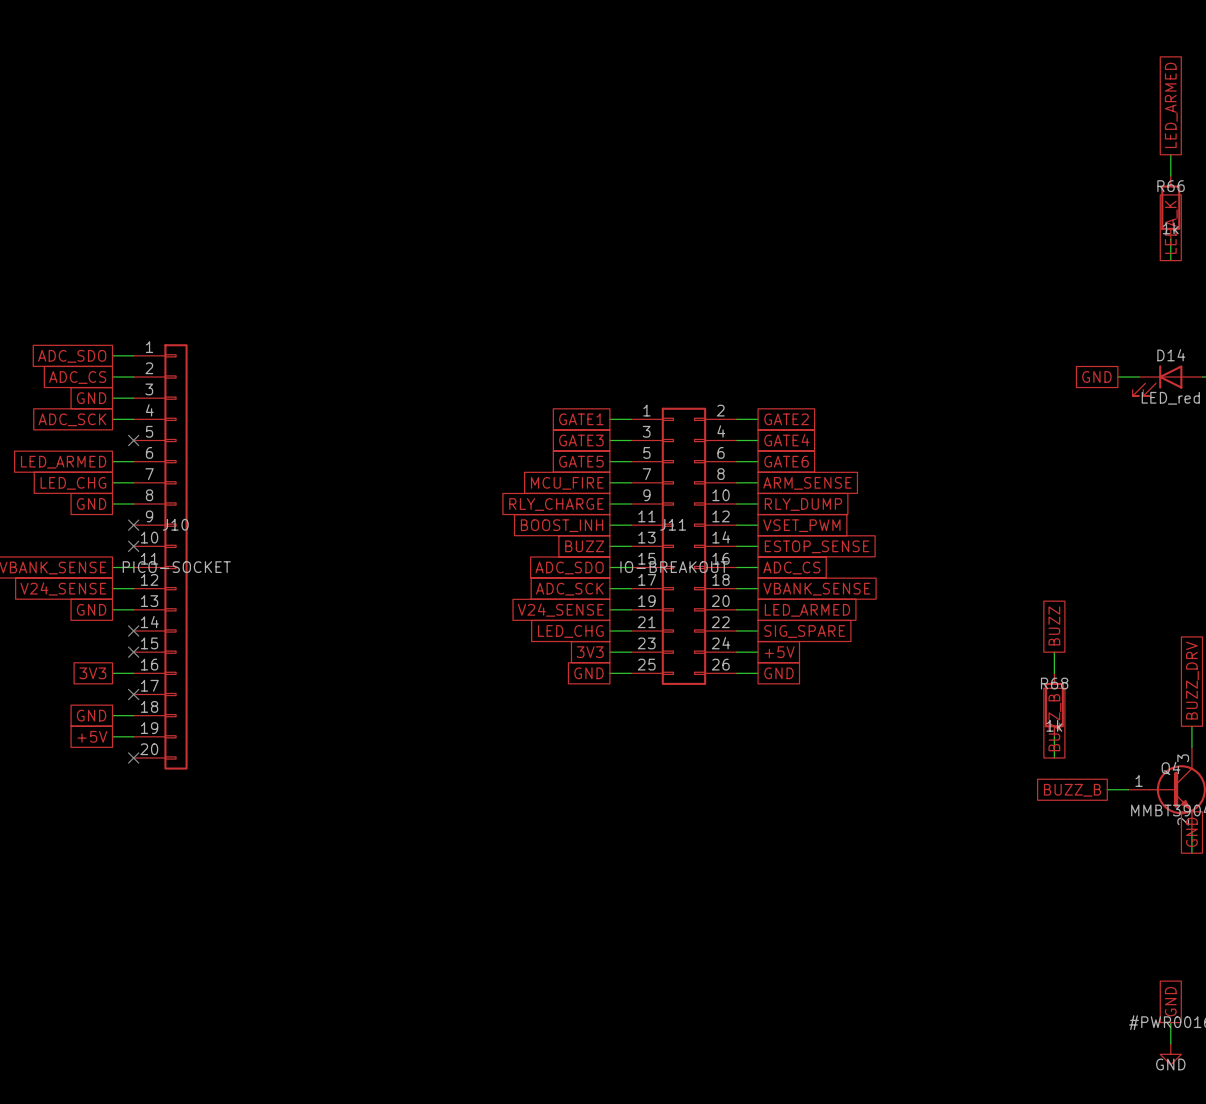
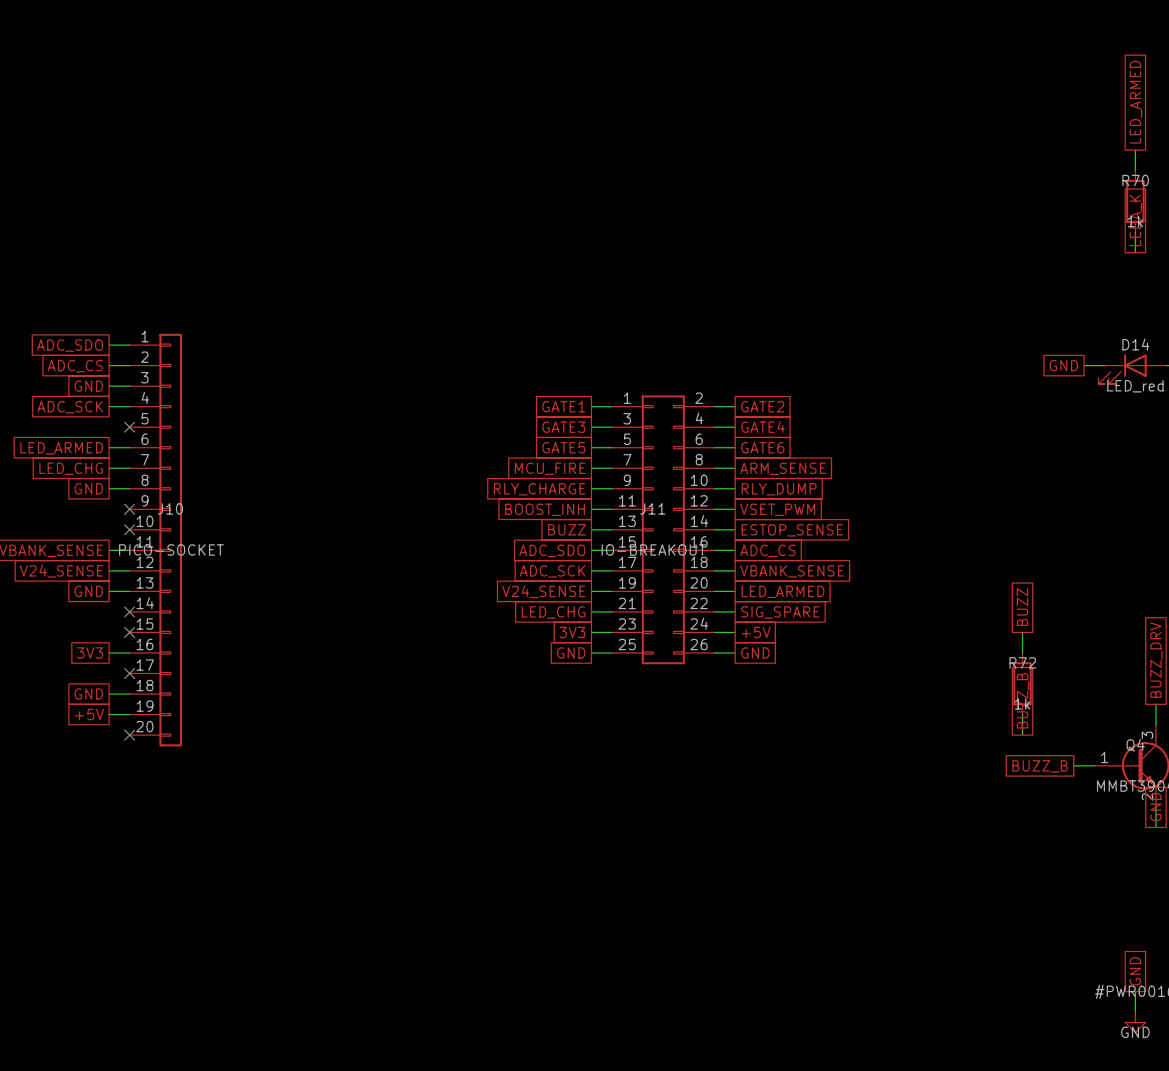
R66 name: R66 (1171, 186) -> R70 (1135, 180)
R68 name: R68 (1054, 683) -> R72 (1022, 662)

